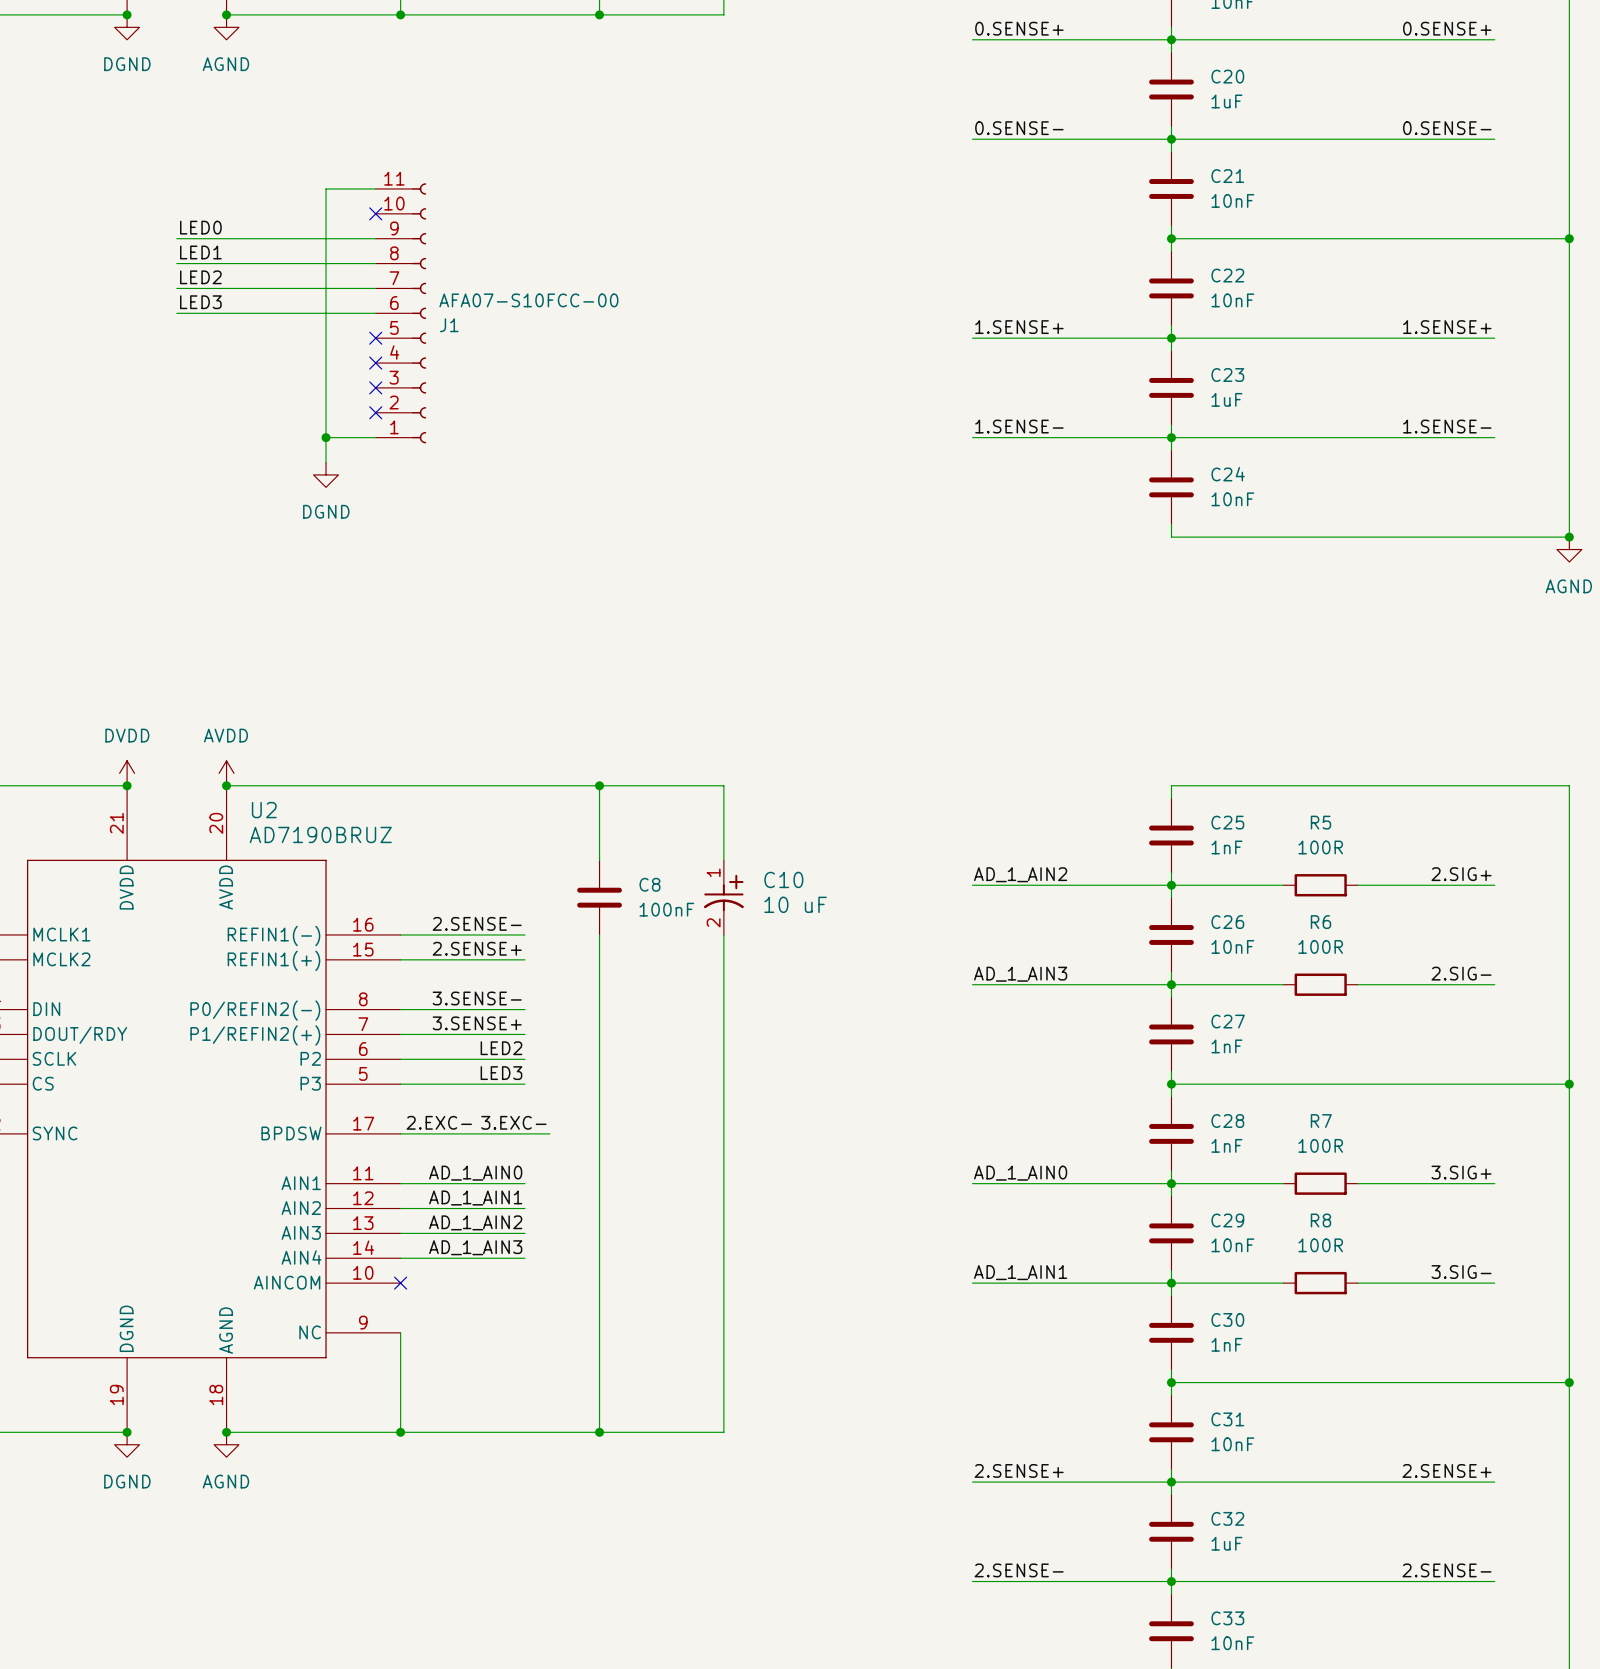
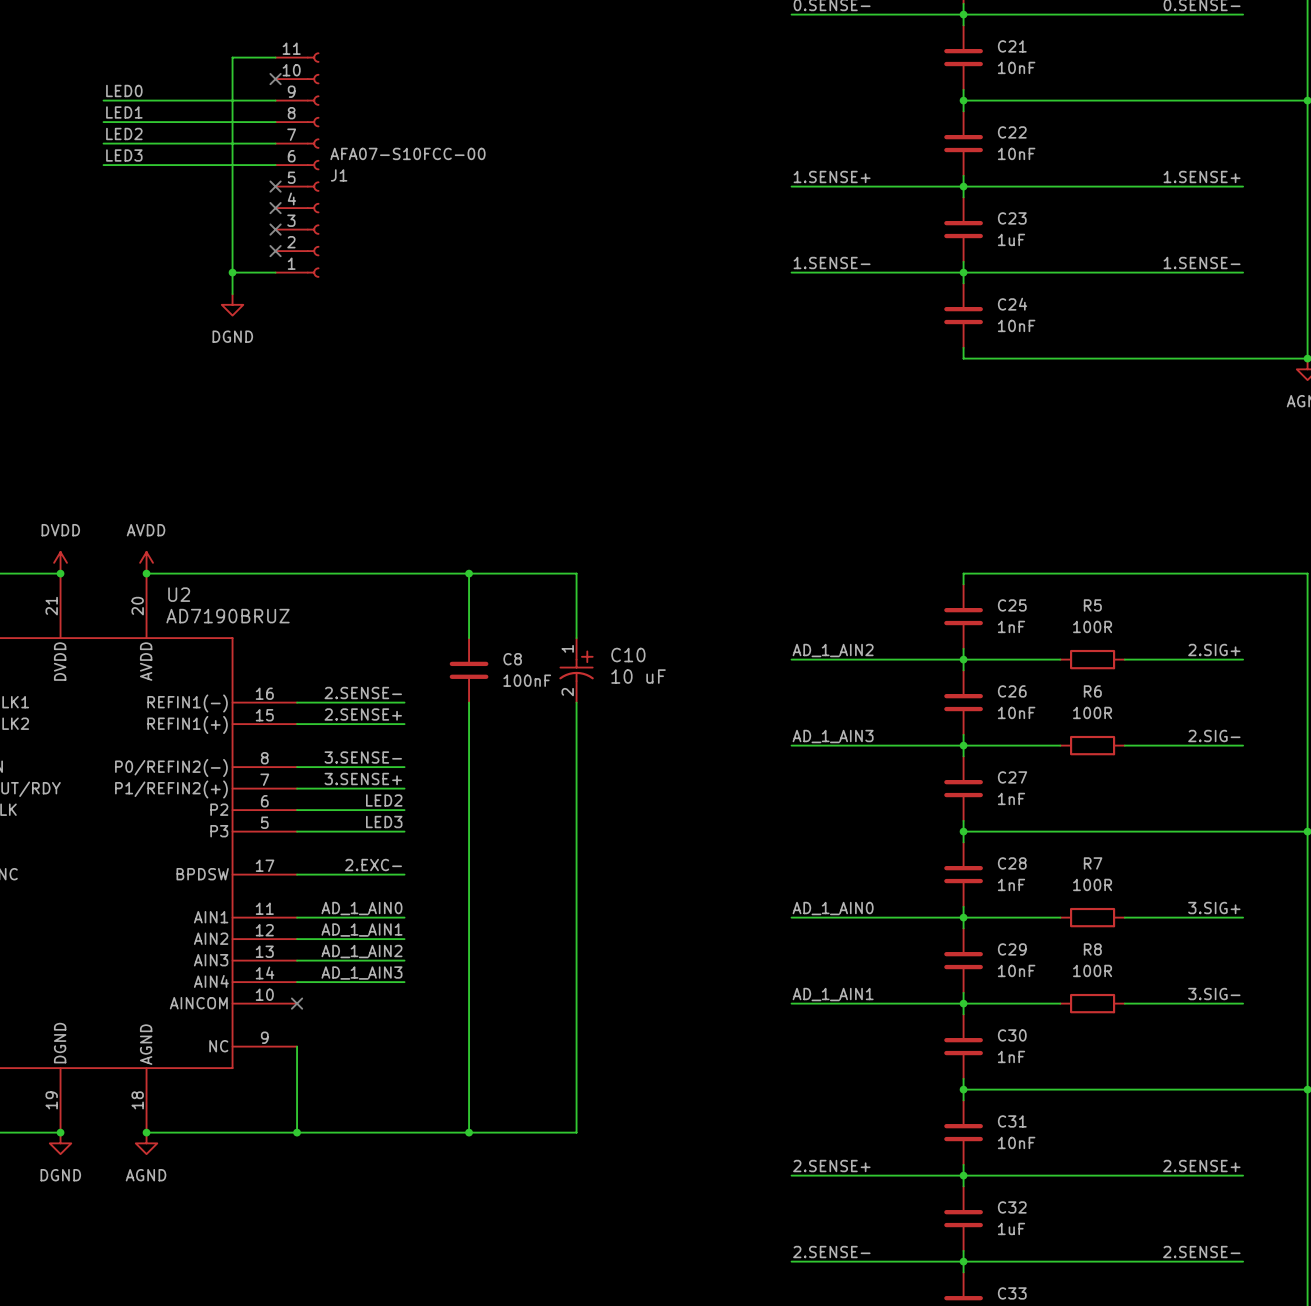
label position: 2.EXC- (439, 1122) -> 2.EXC- (373, 865)
label: 3.EXC- (513, 1122) -> none
wire: (524, 1133) (549, 1133) -> none

